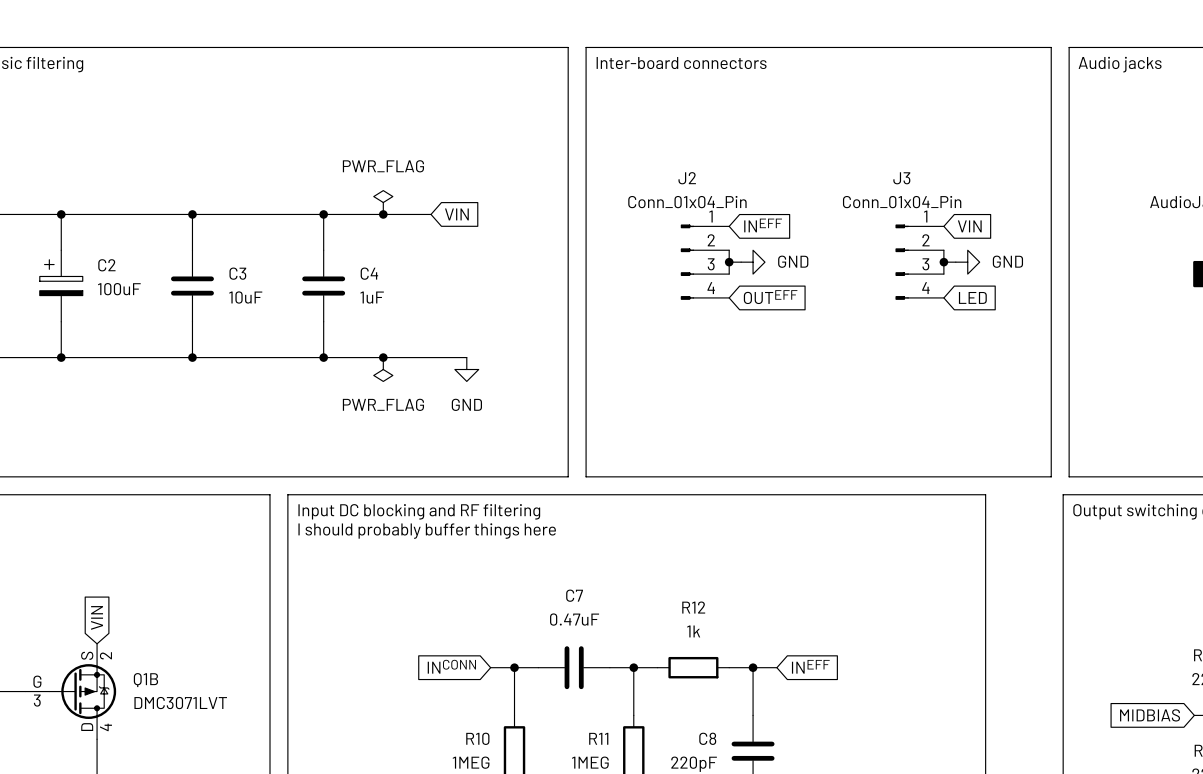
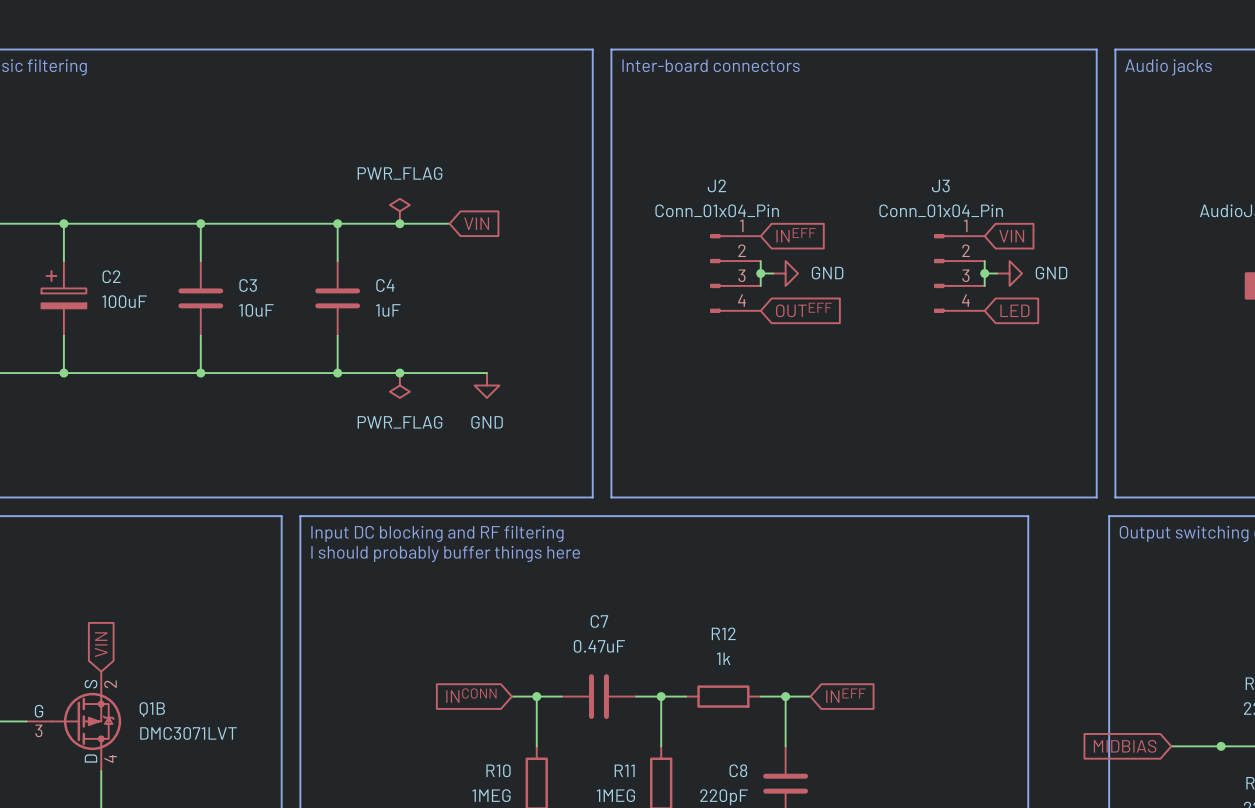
wire: none -> (1171, 746) (1246, 746)
global label position: MIDBIAS (1150, 715) -> MIDBIAS (1125, 746)
junction: none -> (1221, 746)

